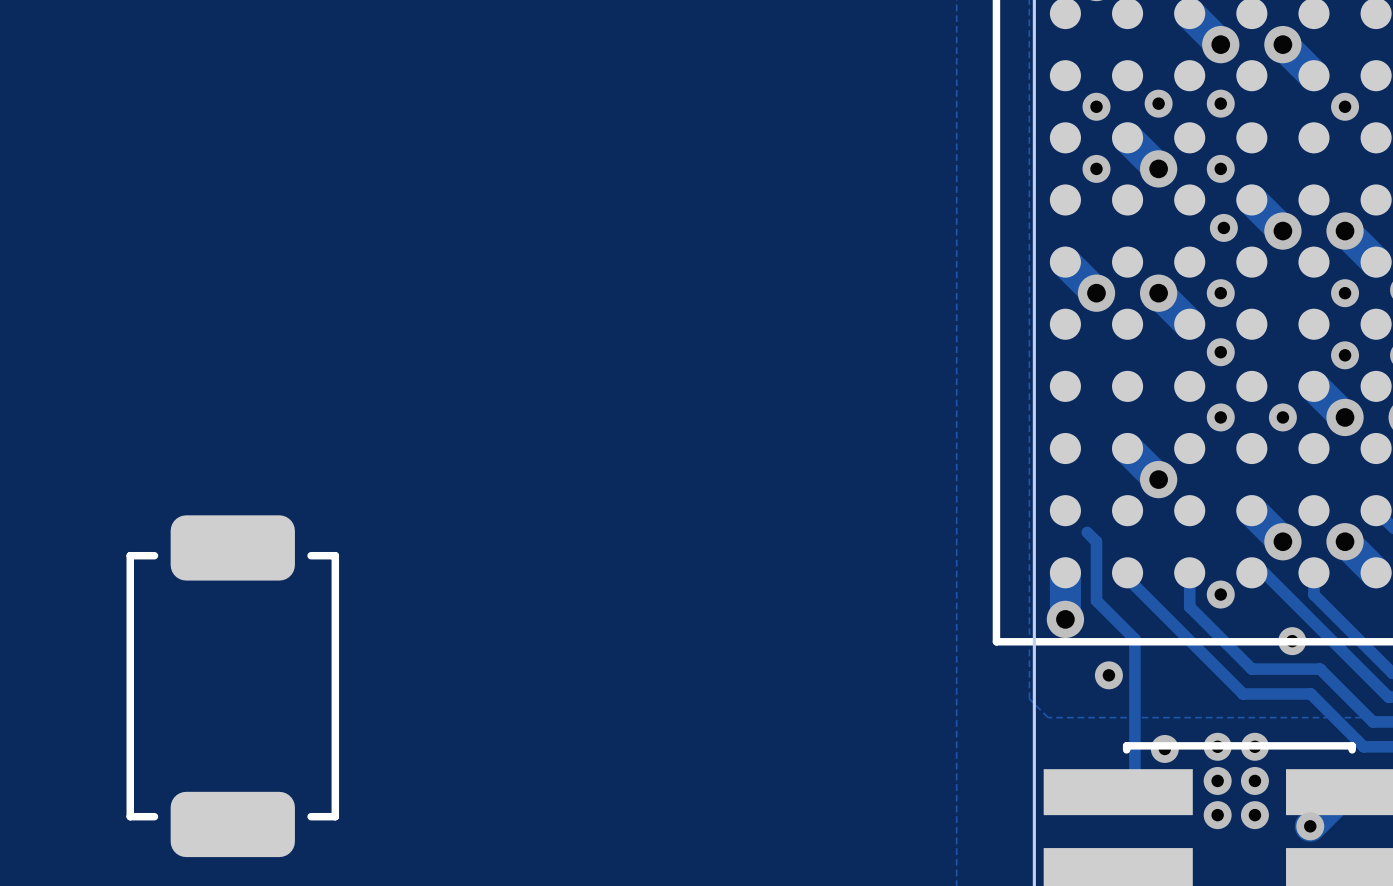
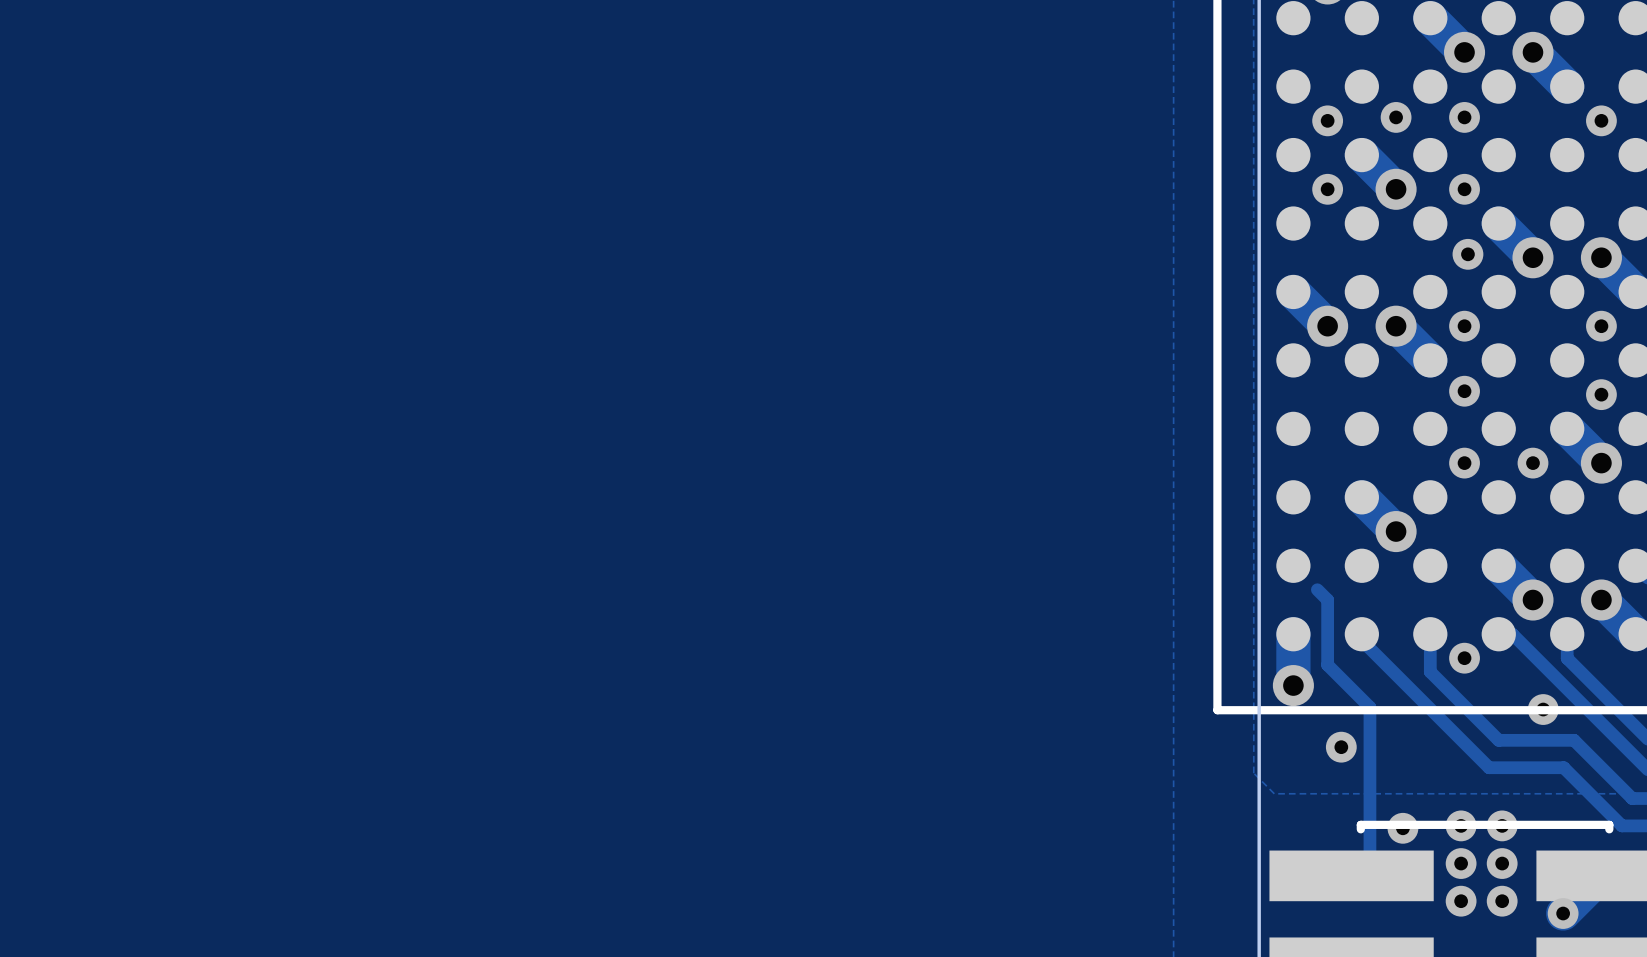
part: (232, 686) -> none

